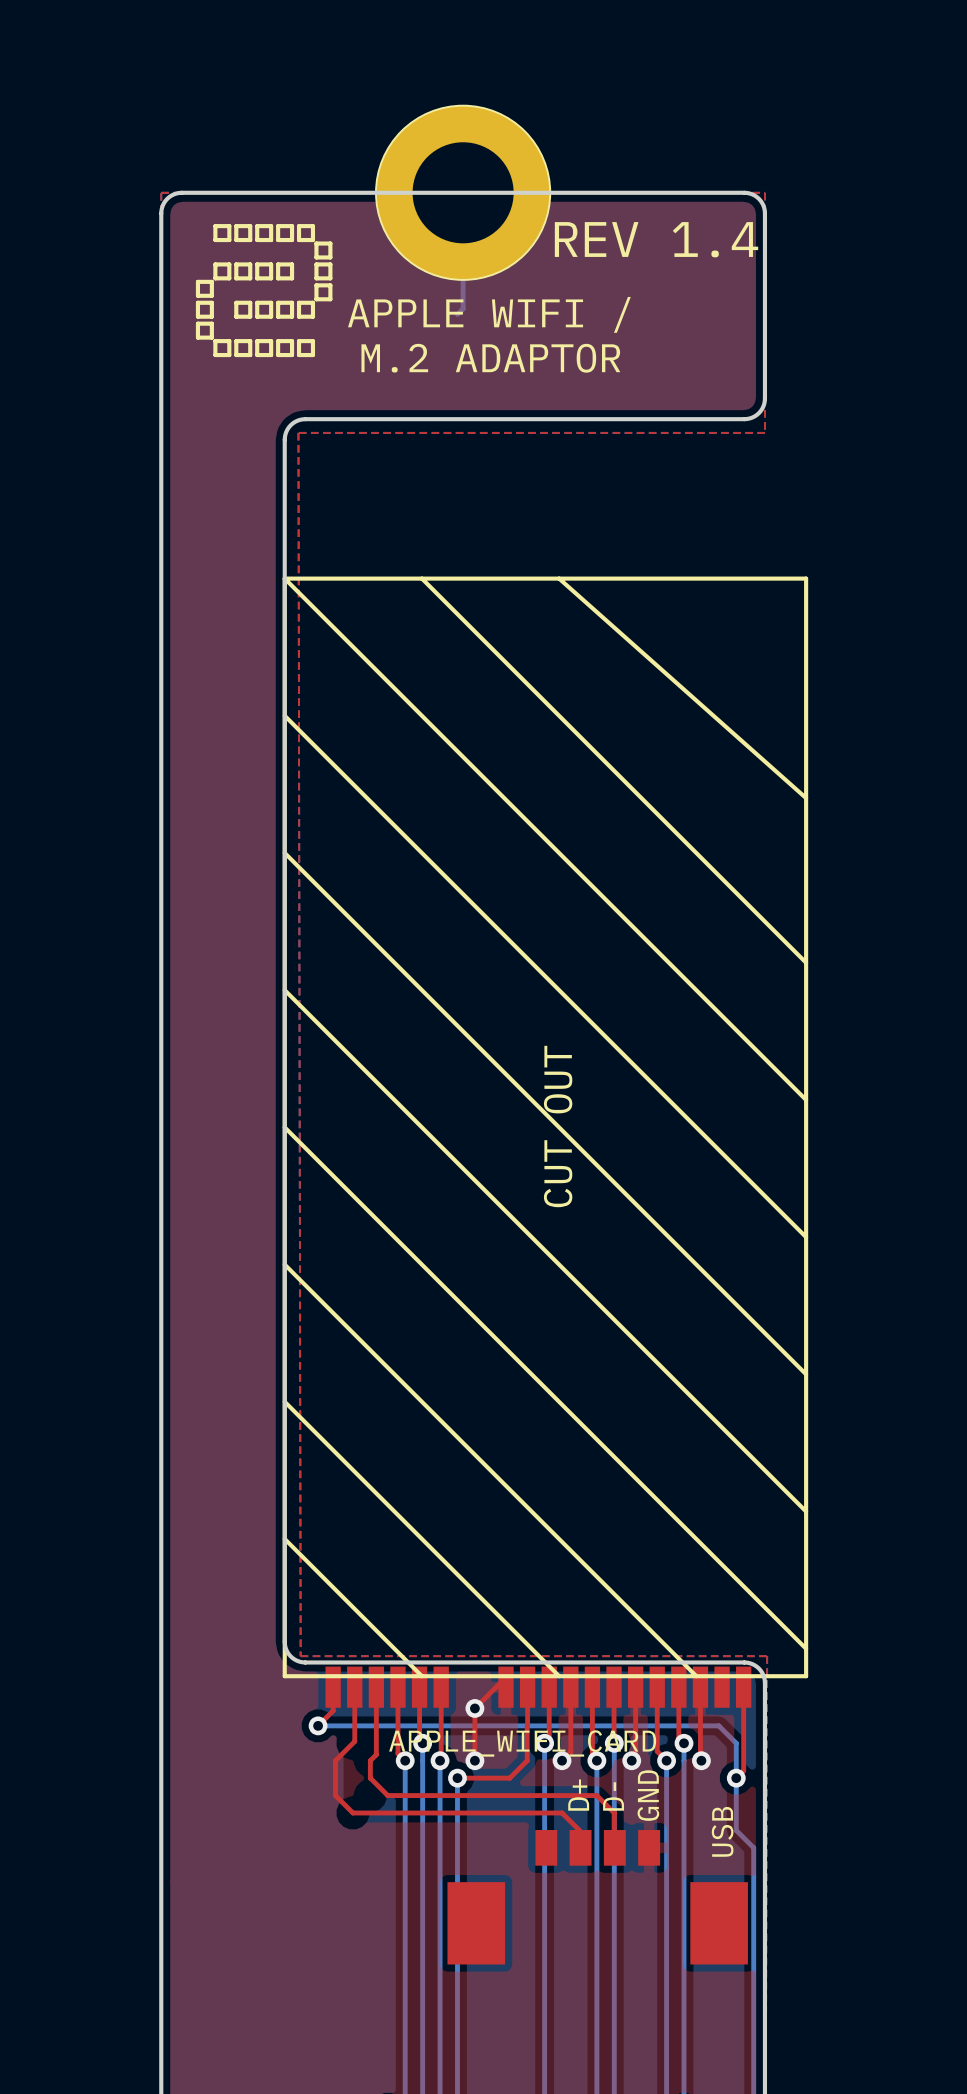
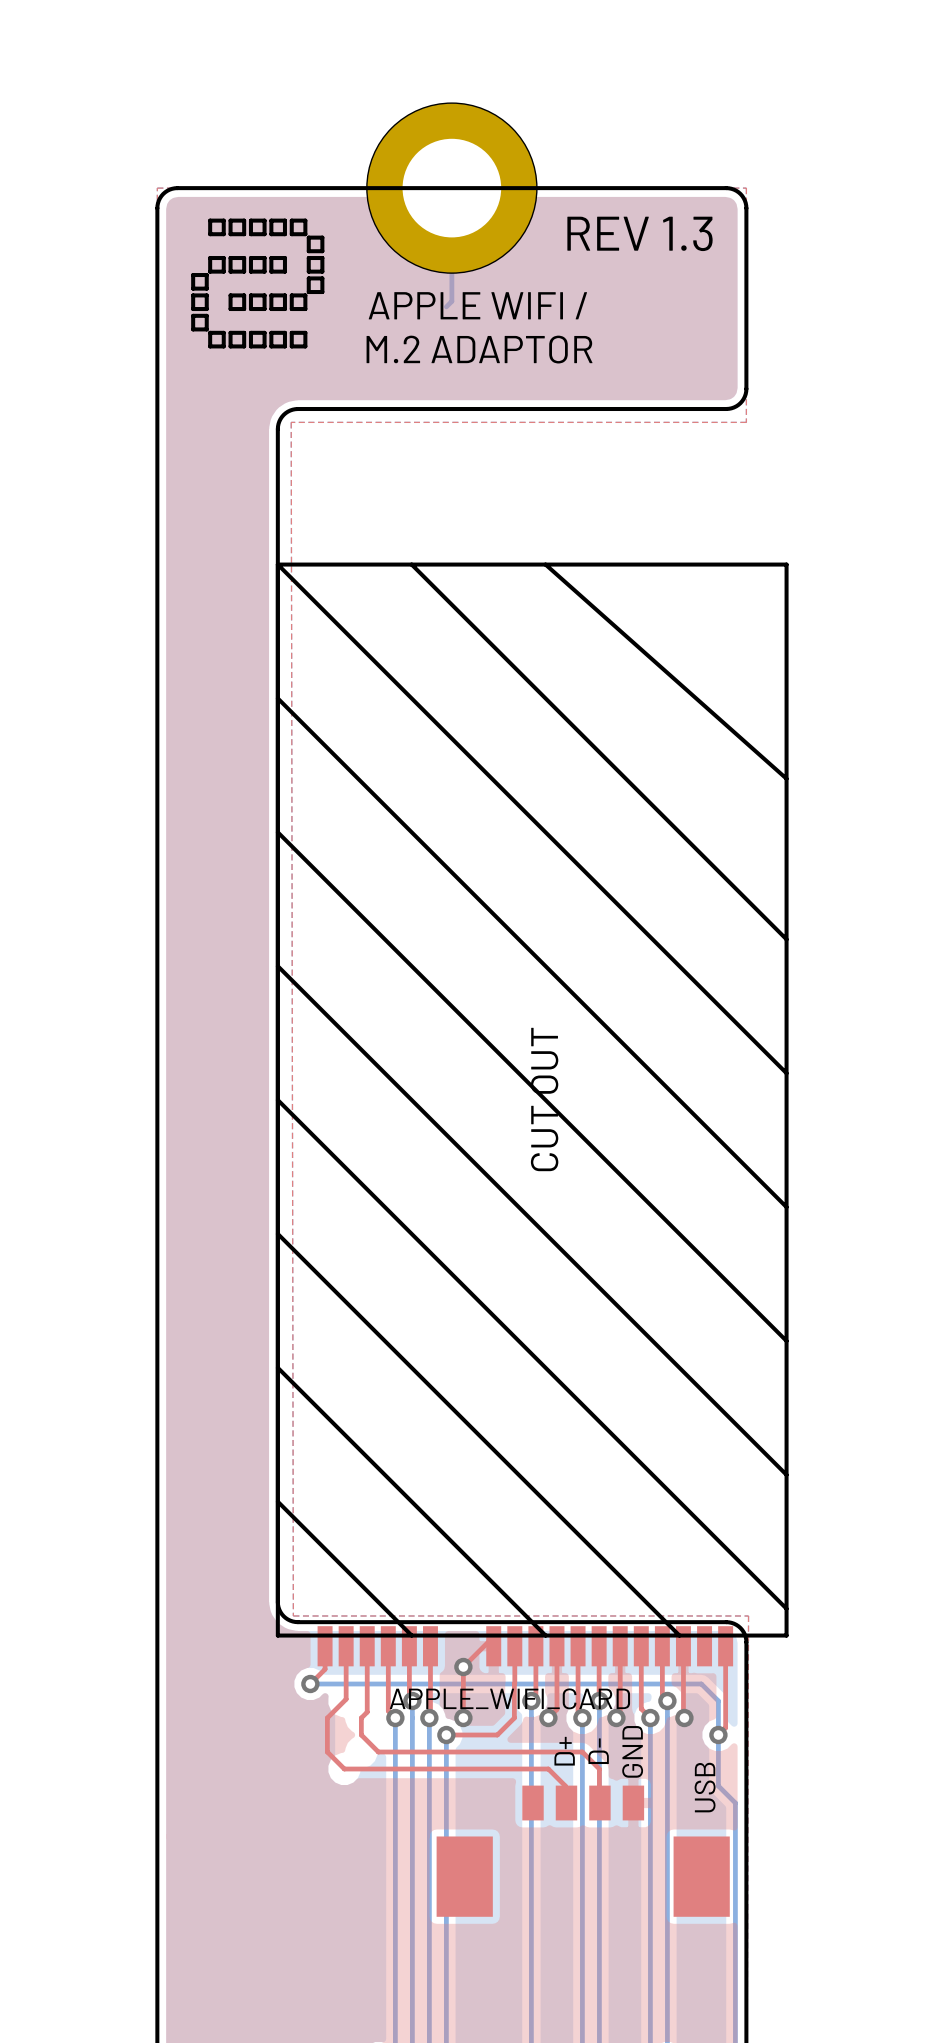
text: REV 1.4 (656, 239) -> REV 1.3 (640, 233)

